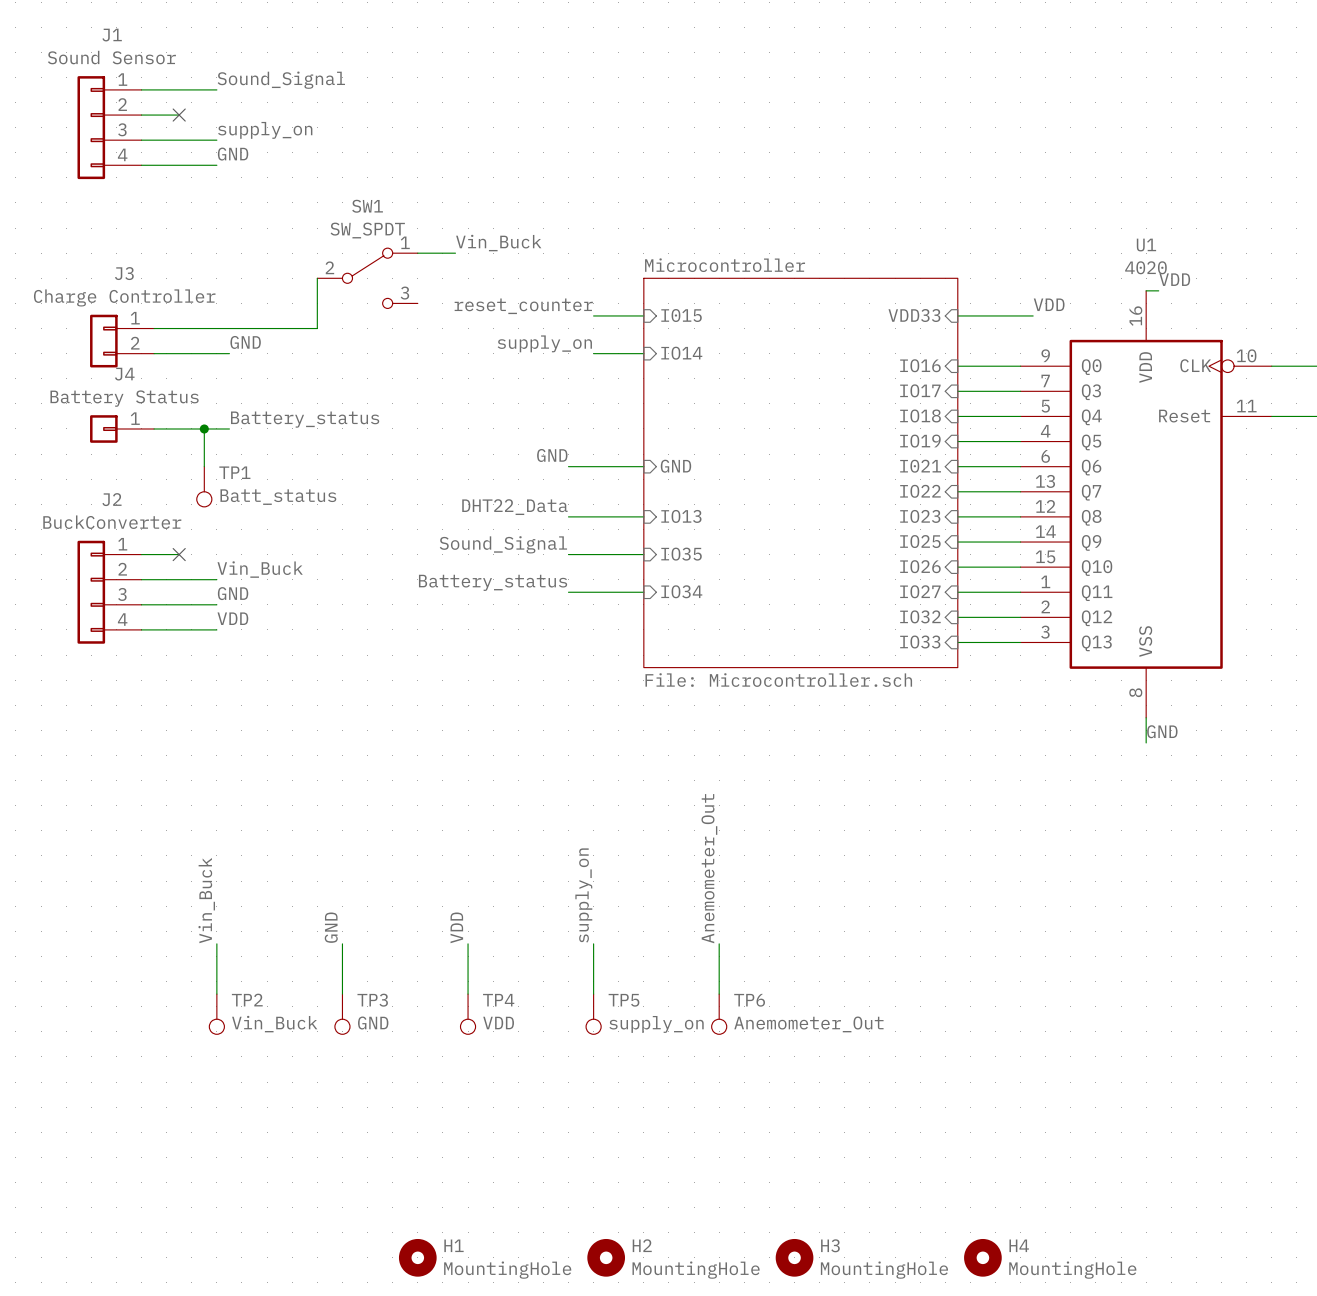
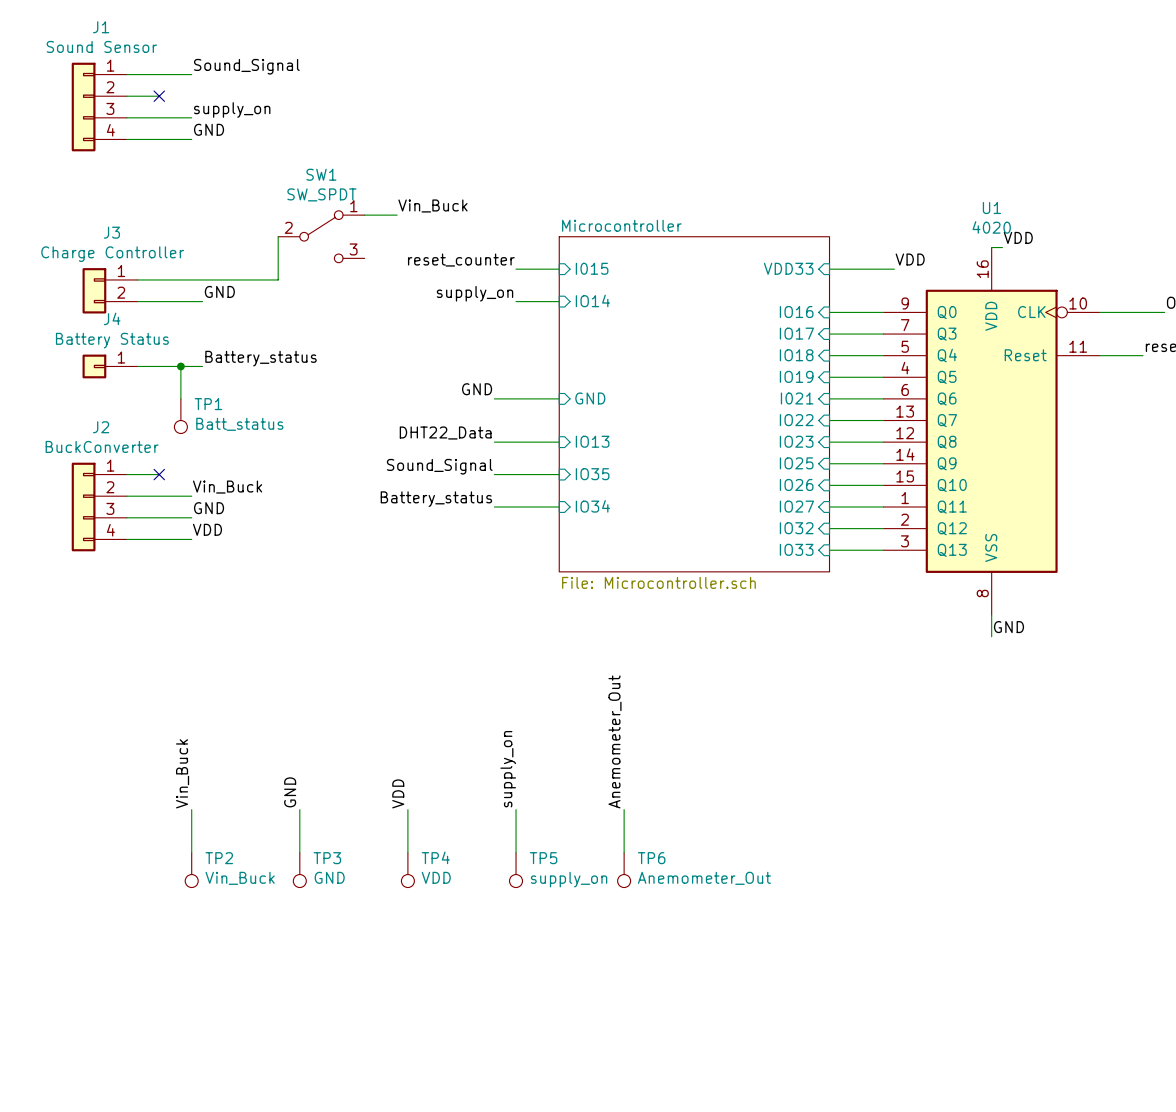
H1: MountingHole (417, 1257) -> none
H2: MountingHole (606, 1257) -> none
H3: MountingHole (794, 1257) -> none
H4: MountingHole (982, 1257) -> none

